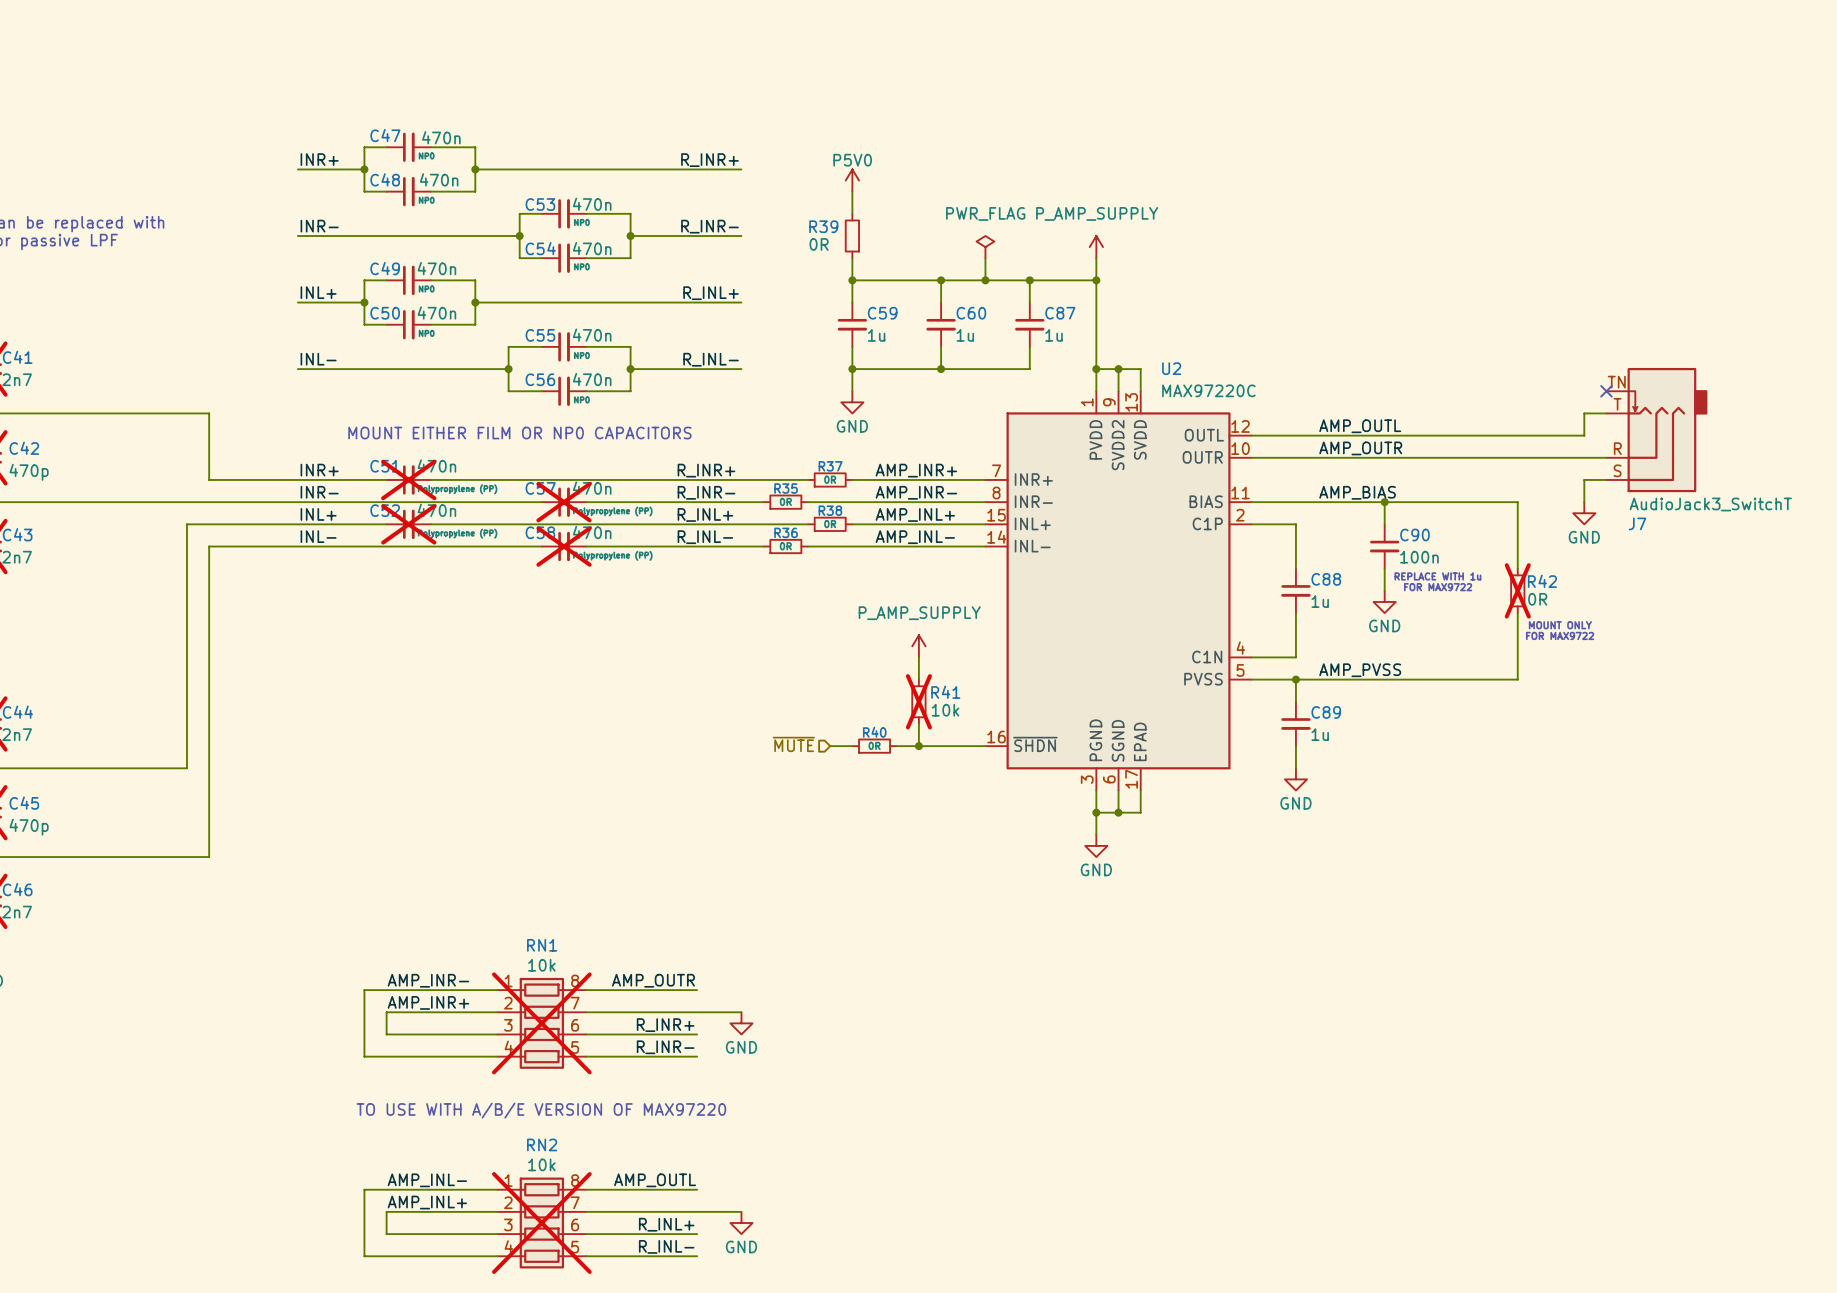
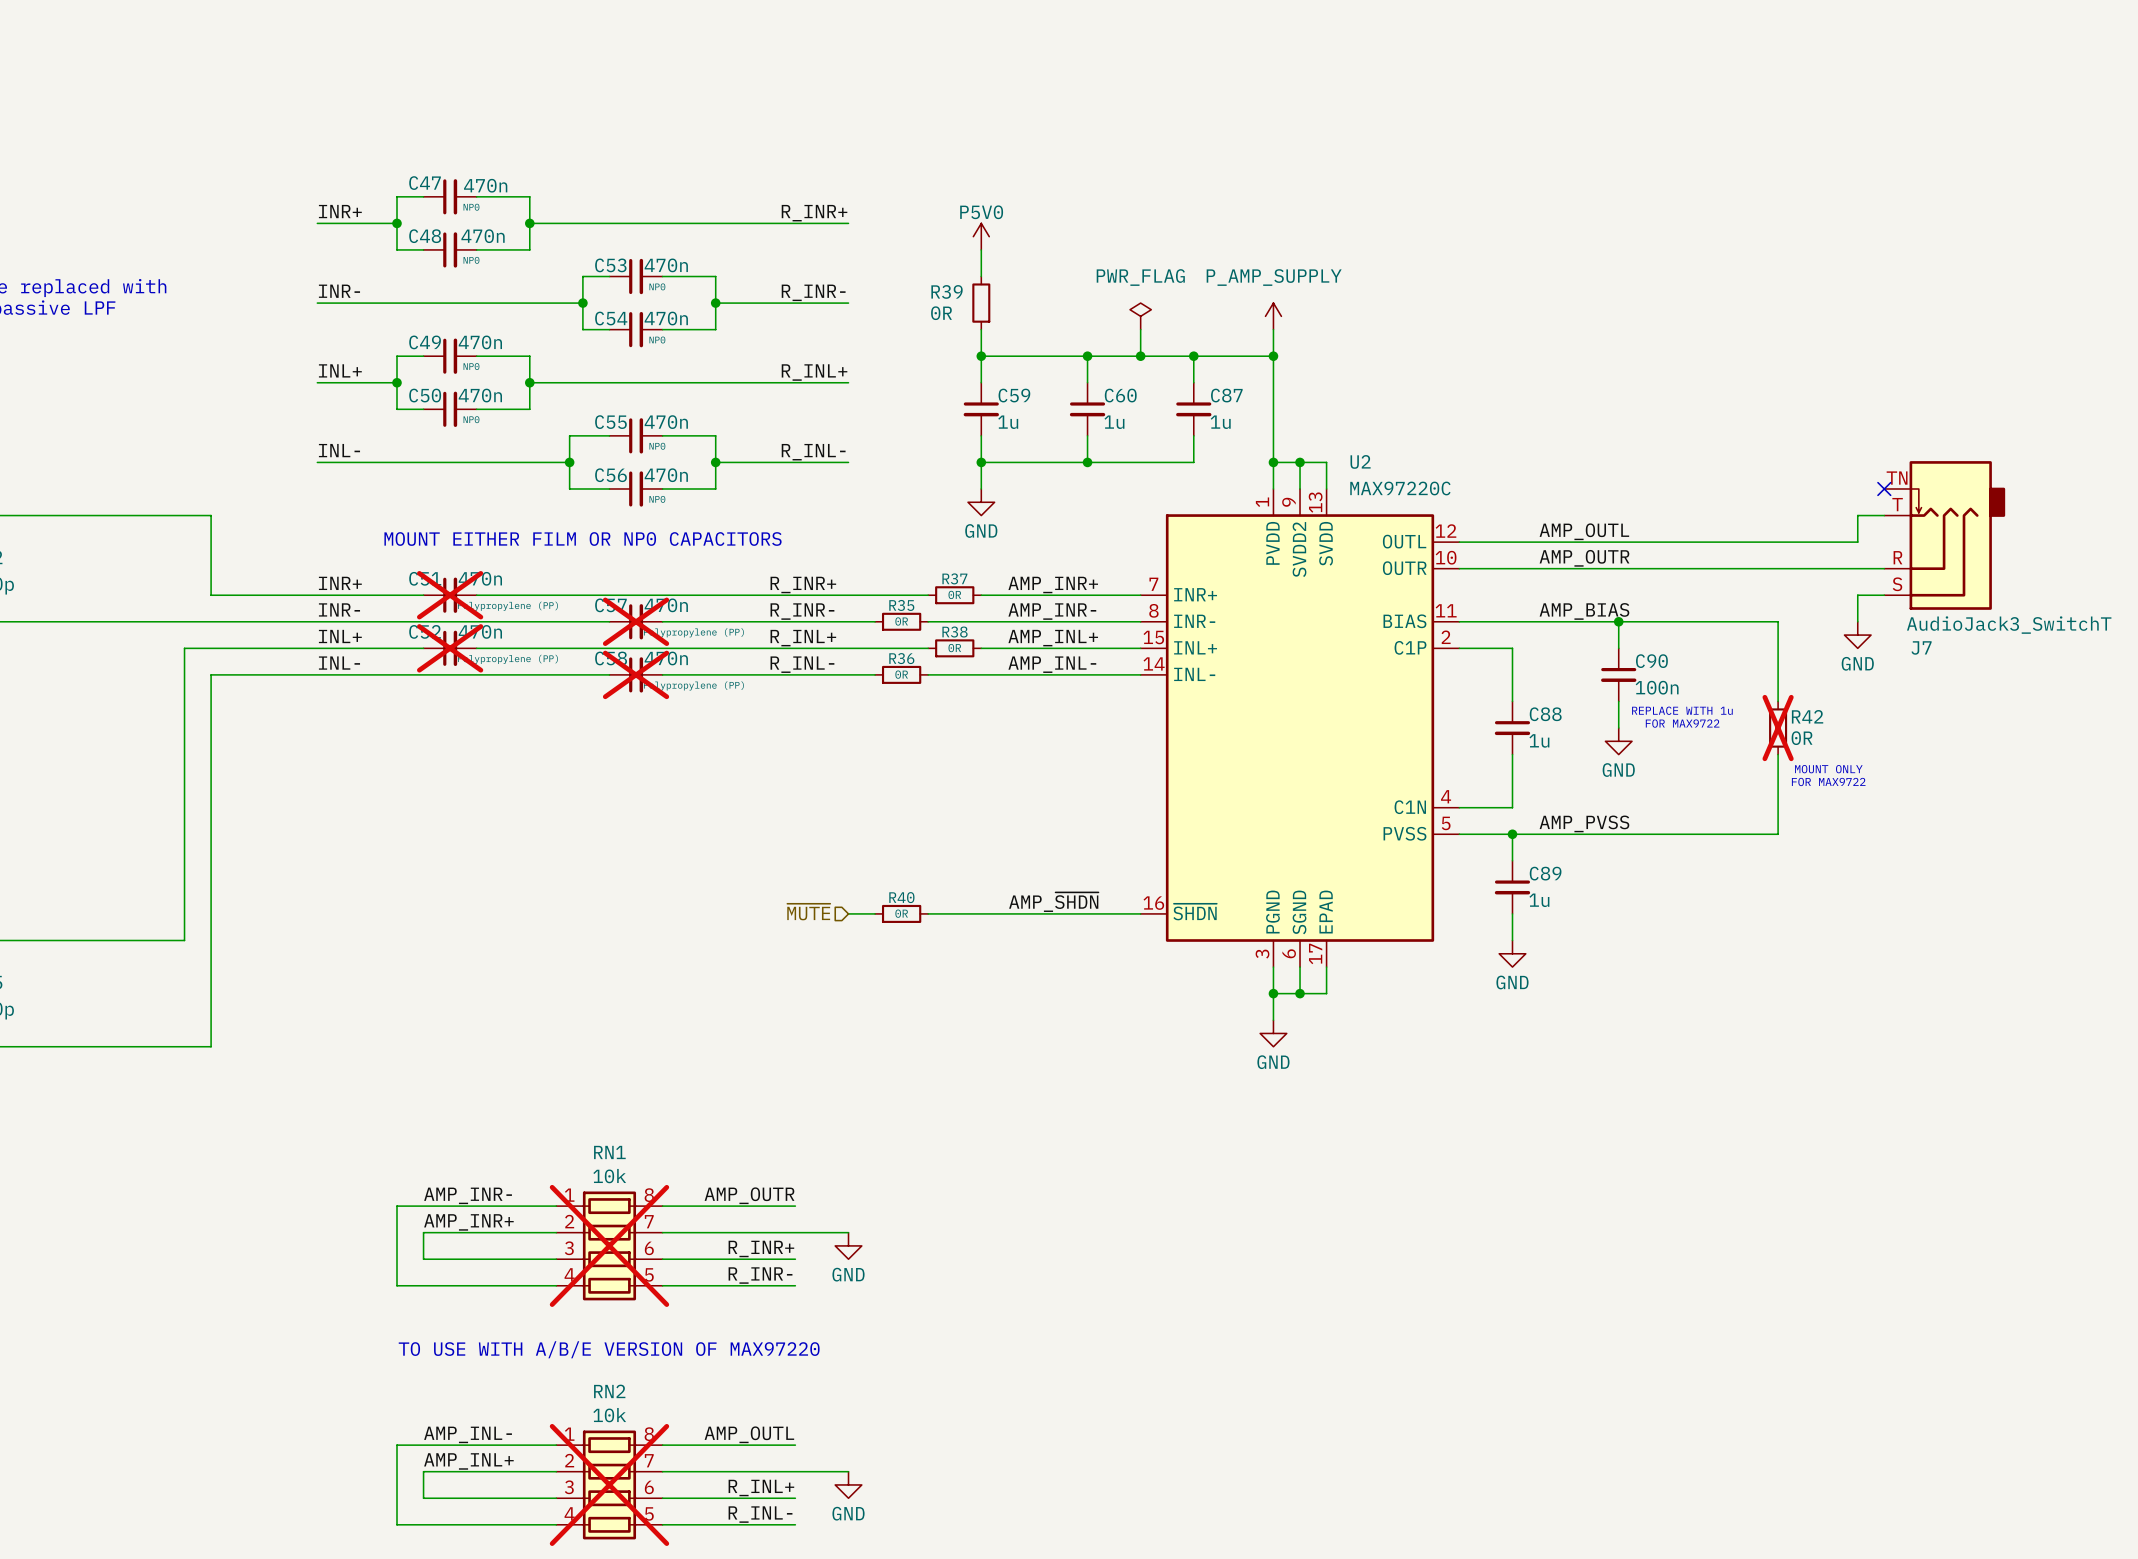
power symbol: P_AMP_SUPPLY (918, 646) -> none
wire: (918, 657) (918, 679) -> none
R41: 10k (918, 701) -> none
wire: (918, 723) (918, 746) -> none
label: none -> AMP_~{SHDN} (1053, 902)
hierarchical label position: ~{MUTE} (793, 744) -> ~{MUTE} (808, 912)
wire: none -> (848, 913) (875, 913)
wire: none -> (928, 913) (954, 913)
wire: none -> (981, 913) (1034, 913)
R40 position: (874, 746) -> (901, 913)
junction: (918, 746) -> none

